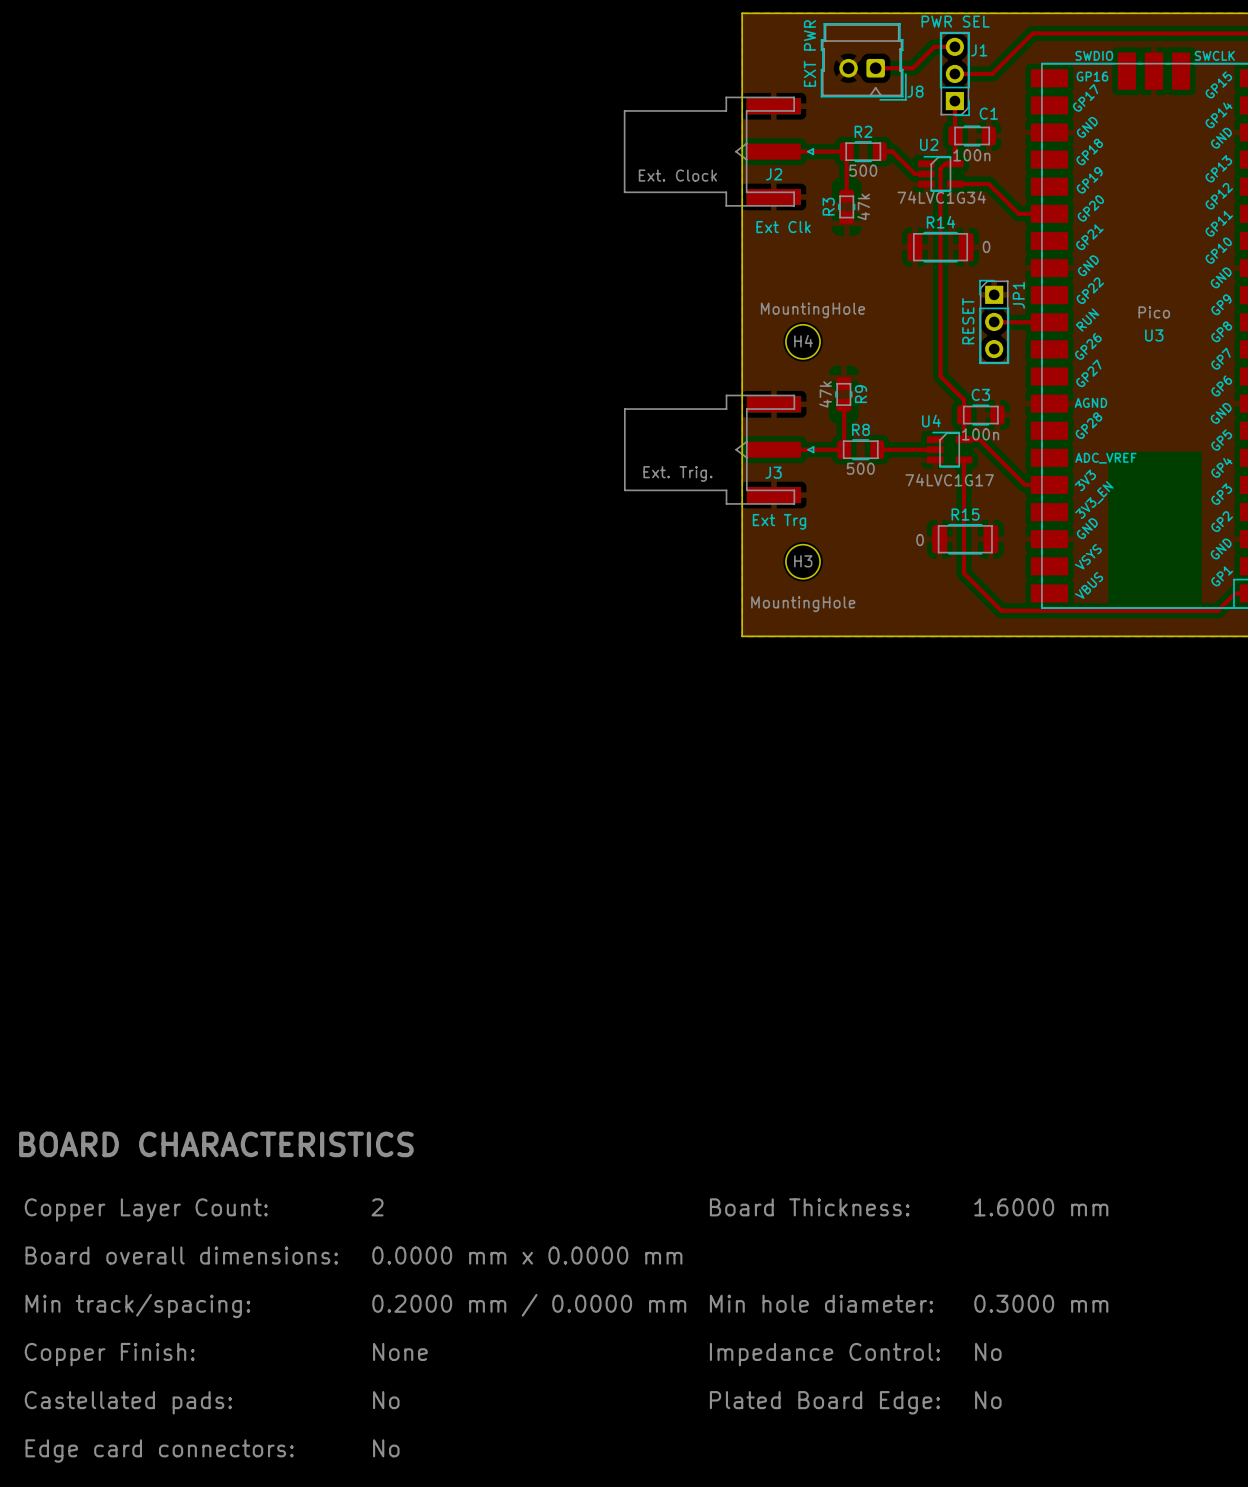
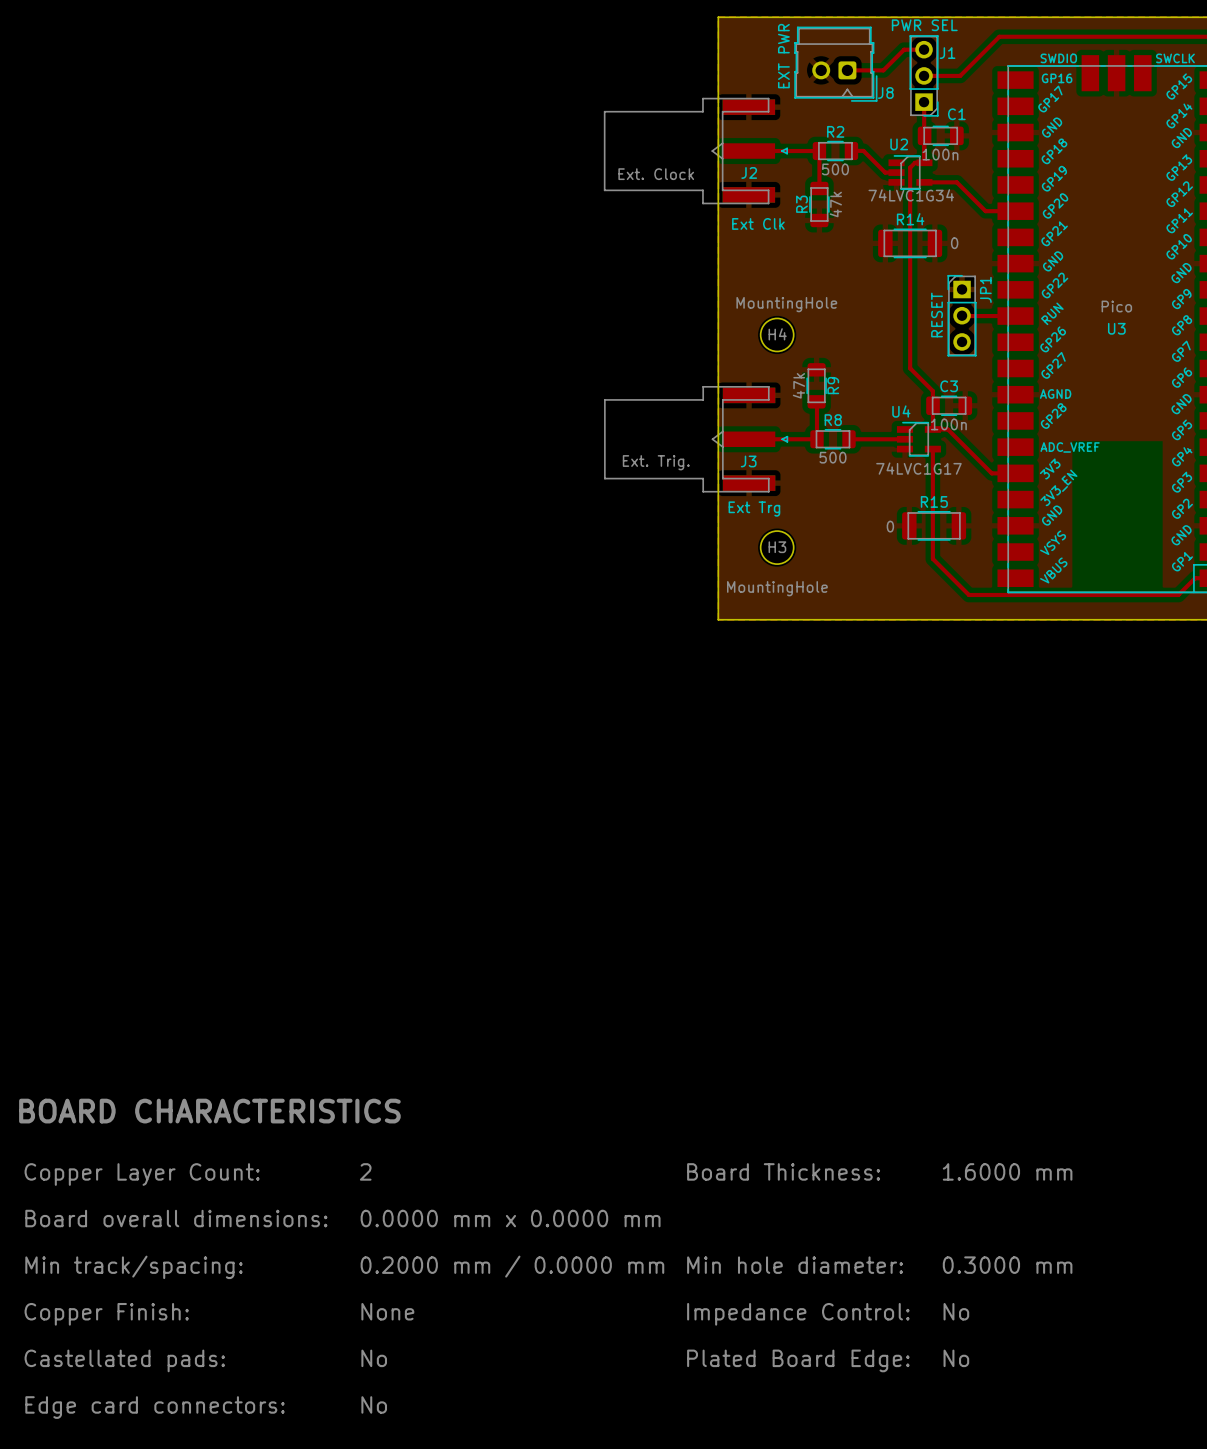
R3 footprint: [838, 189, 856, 225] -> [809, 181, 830, 228]
R9 footprint: [835, 377, 853, 412] -> [806, 363, 827, 409]

